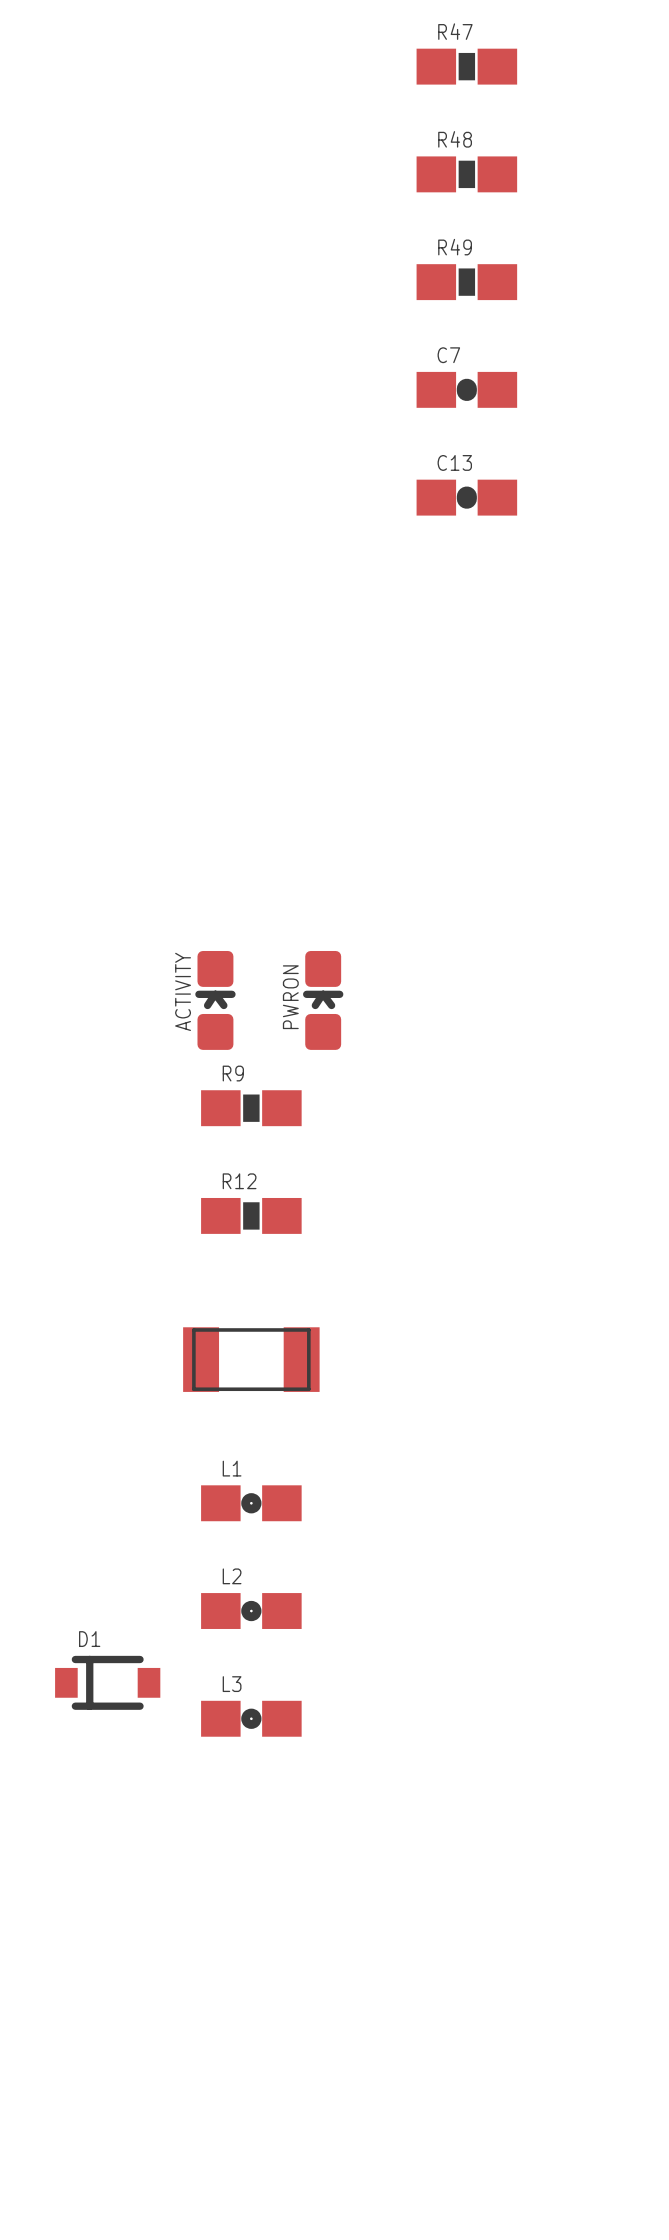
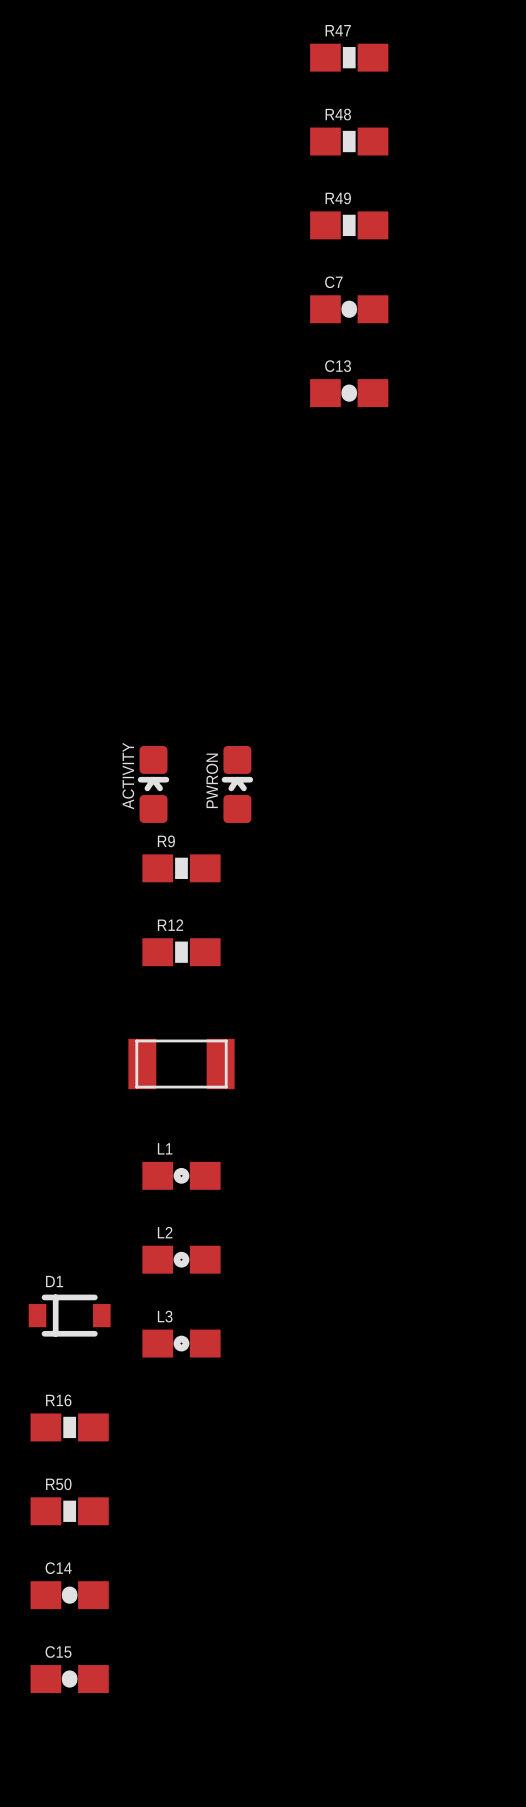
R16: none -> (69, 1427)
R50: none -> (69, 1511)
C14: none -> (69, 1595)
C15: none -> (69, 1679)

